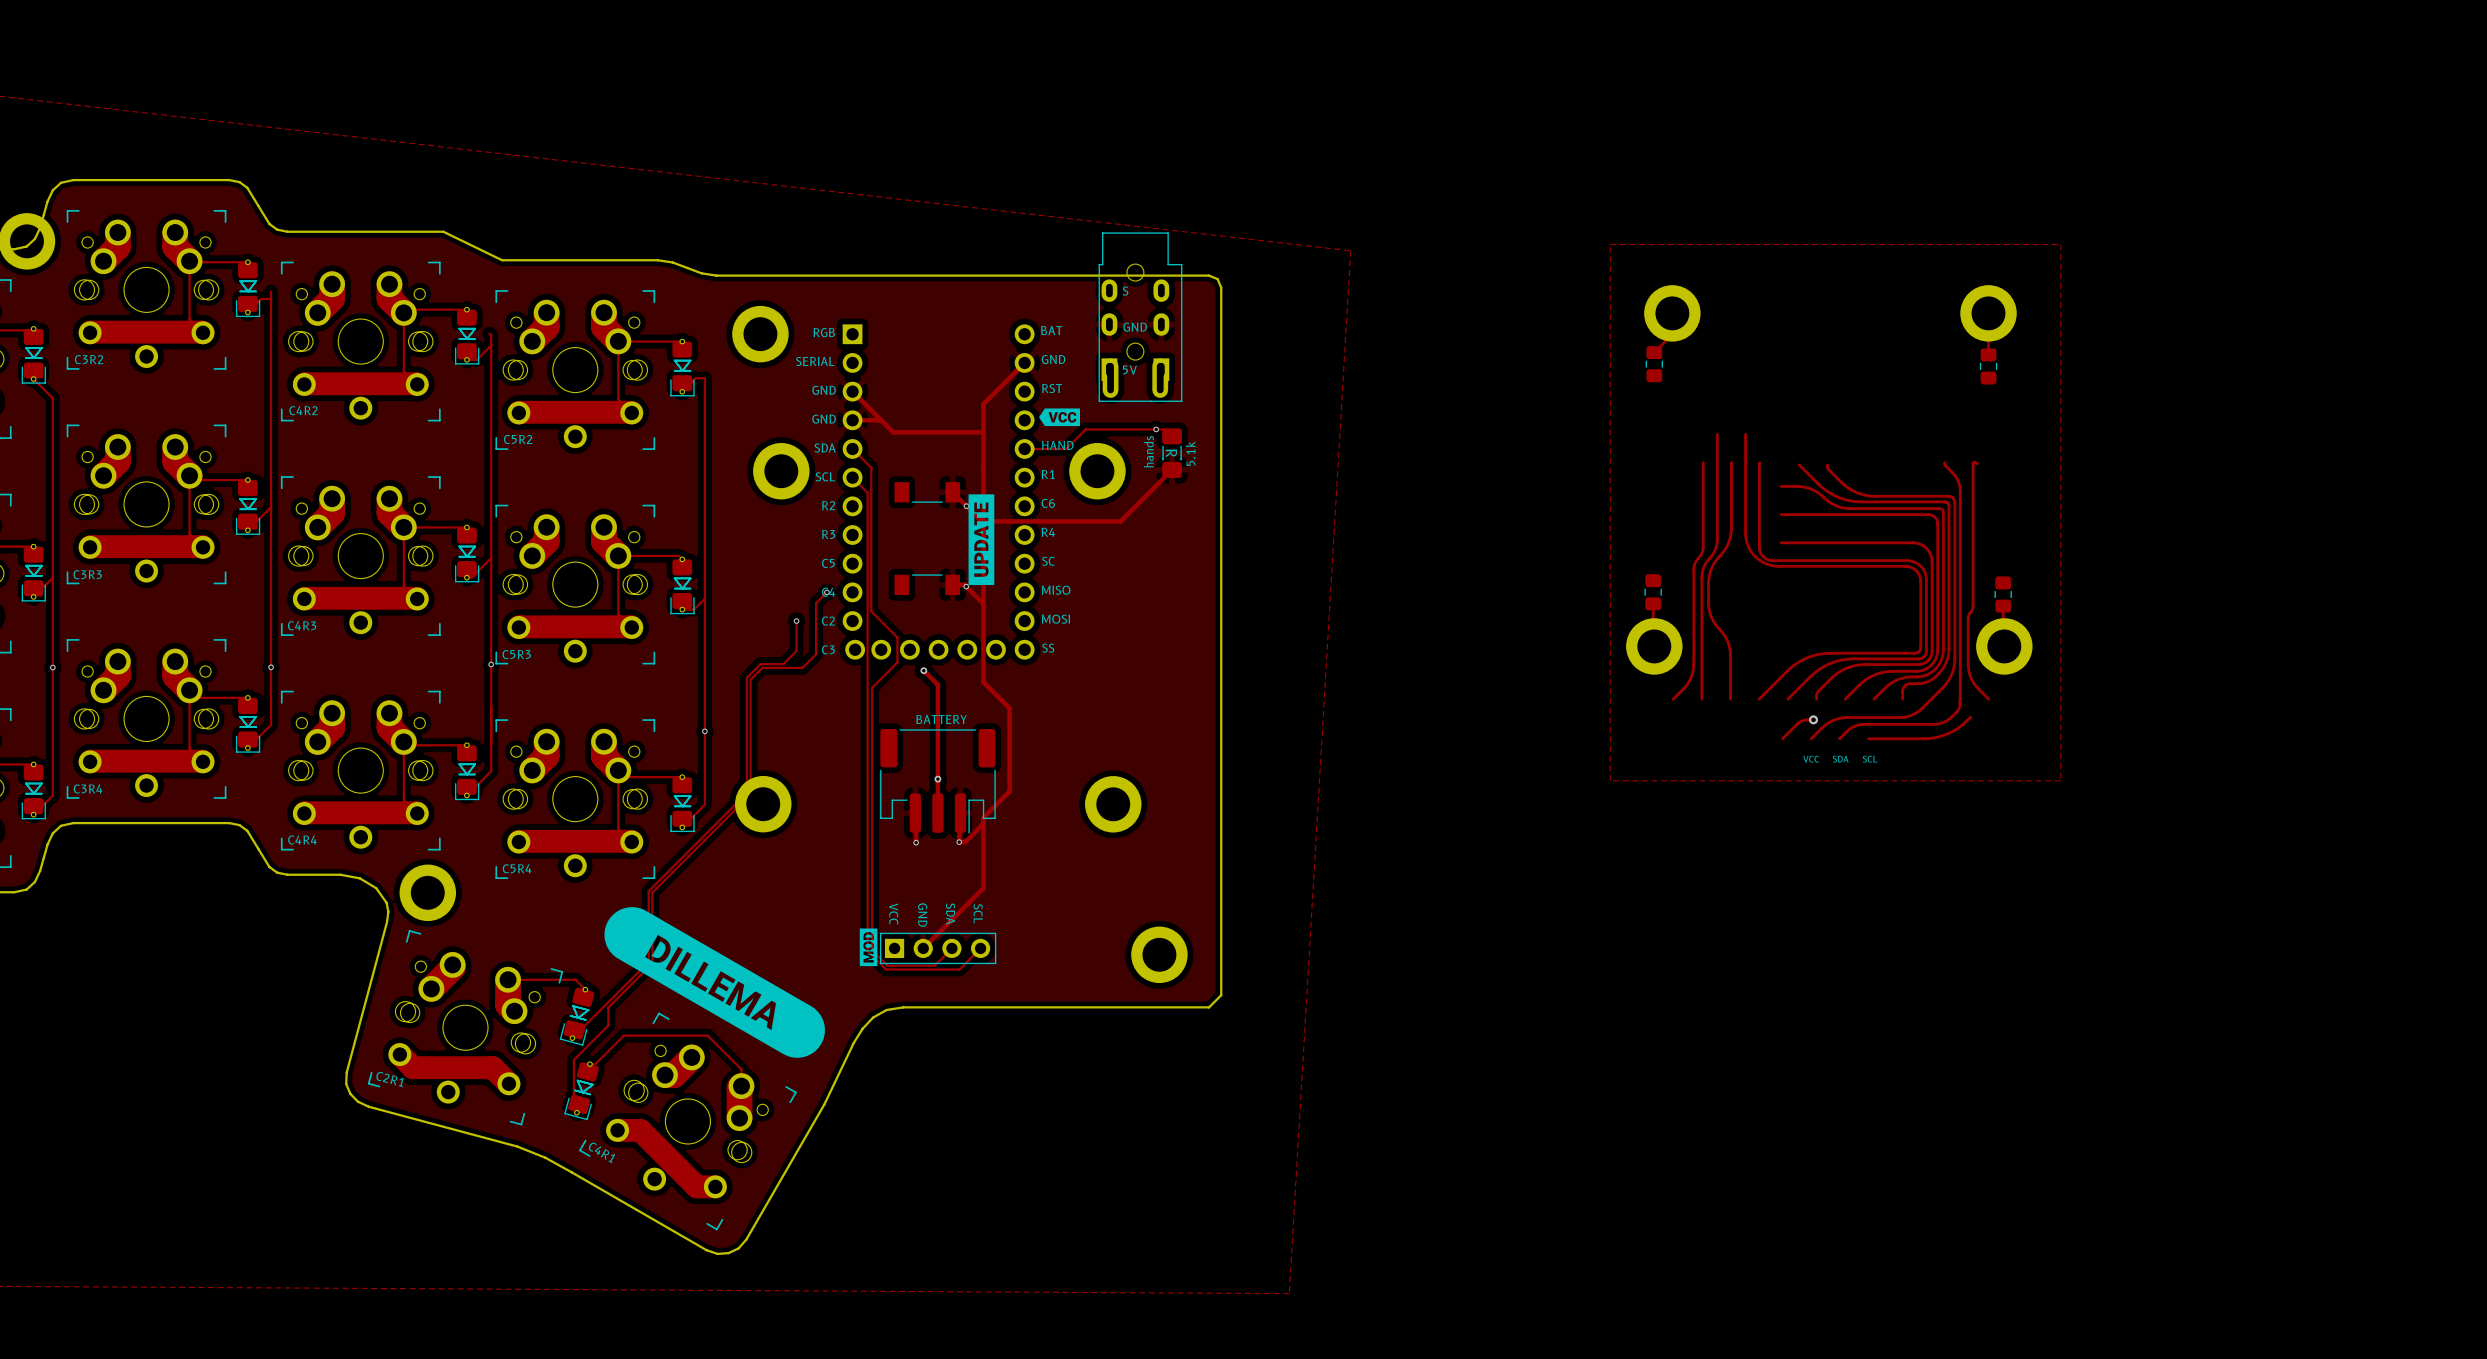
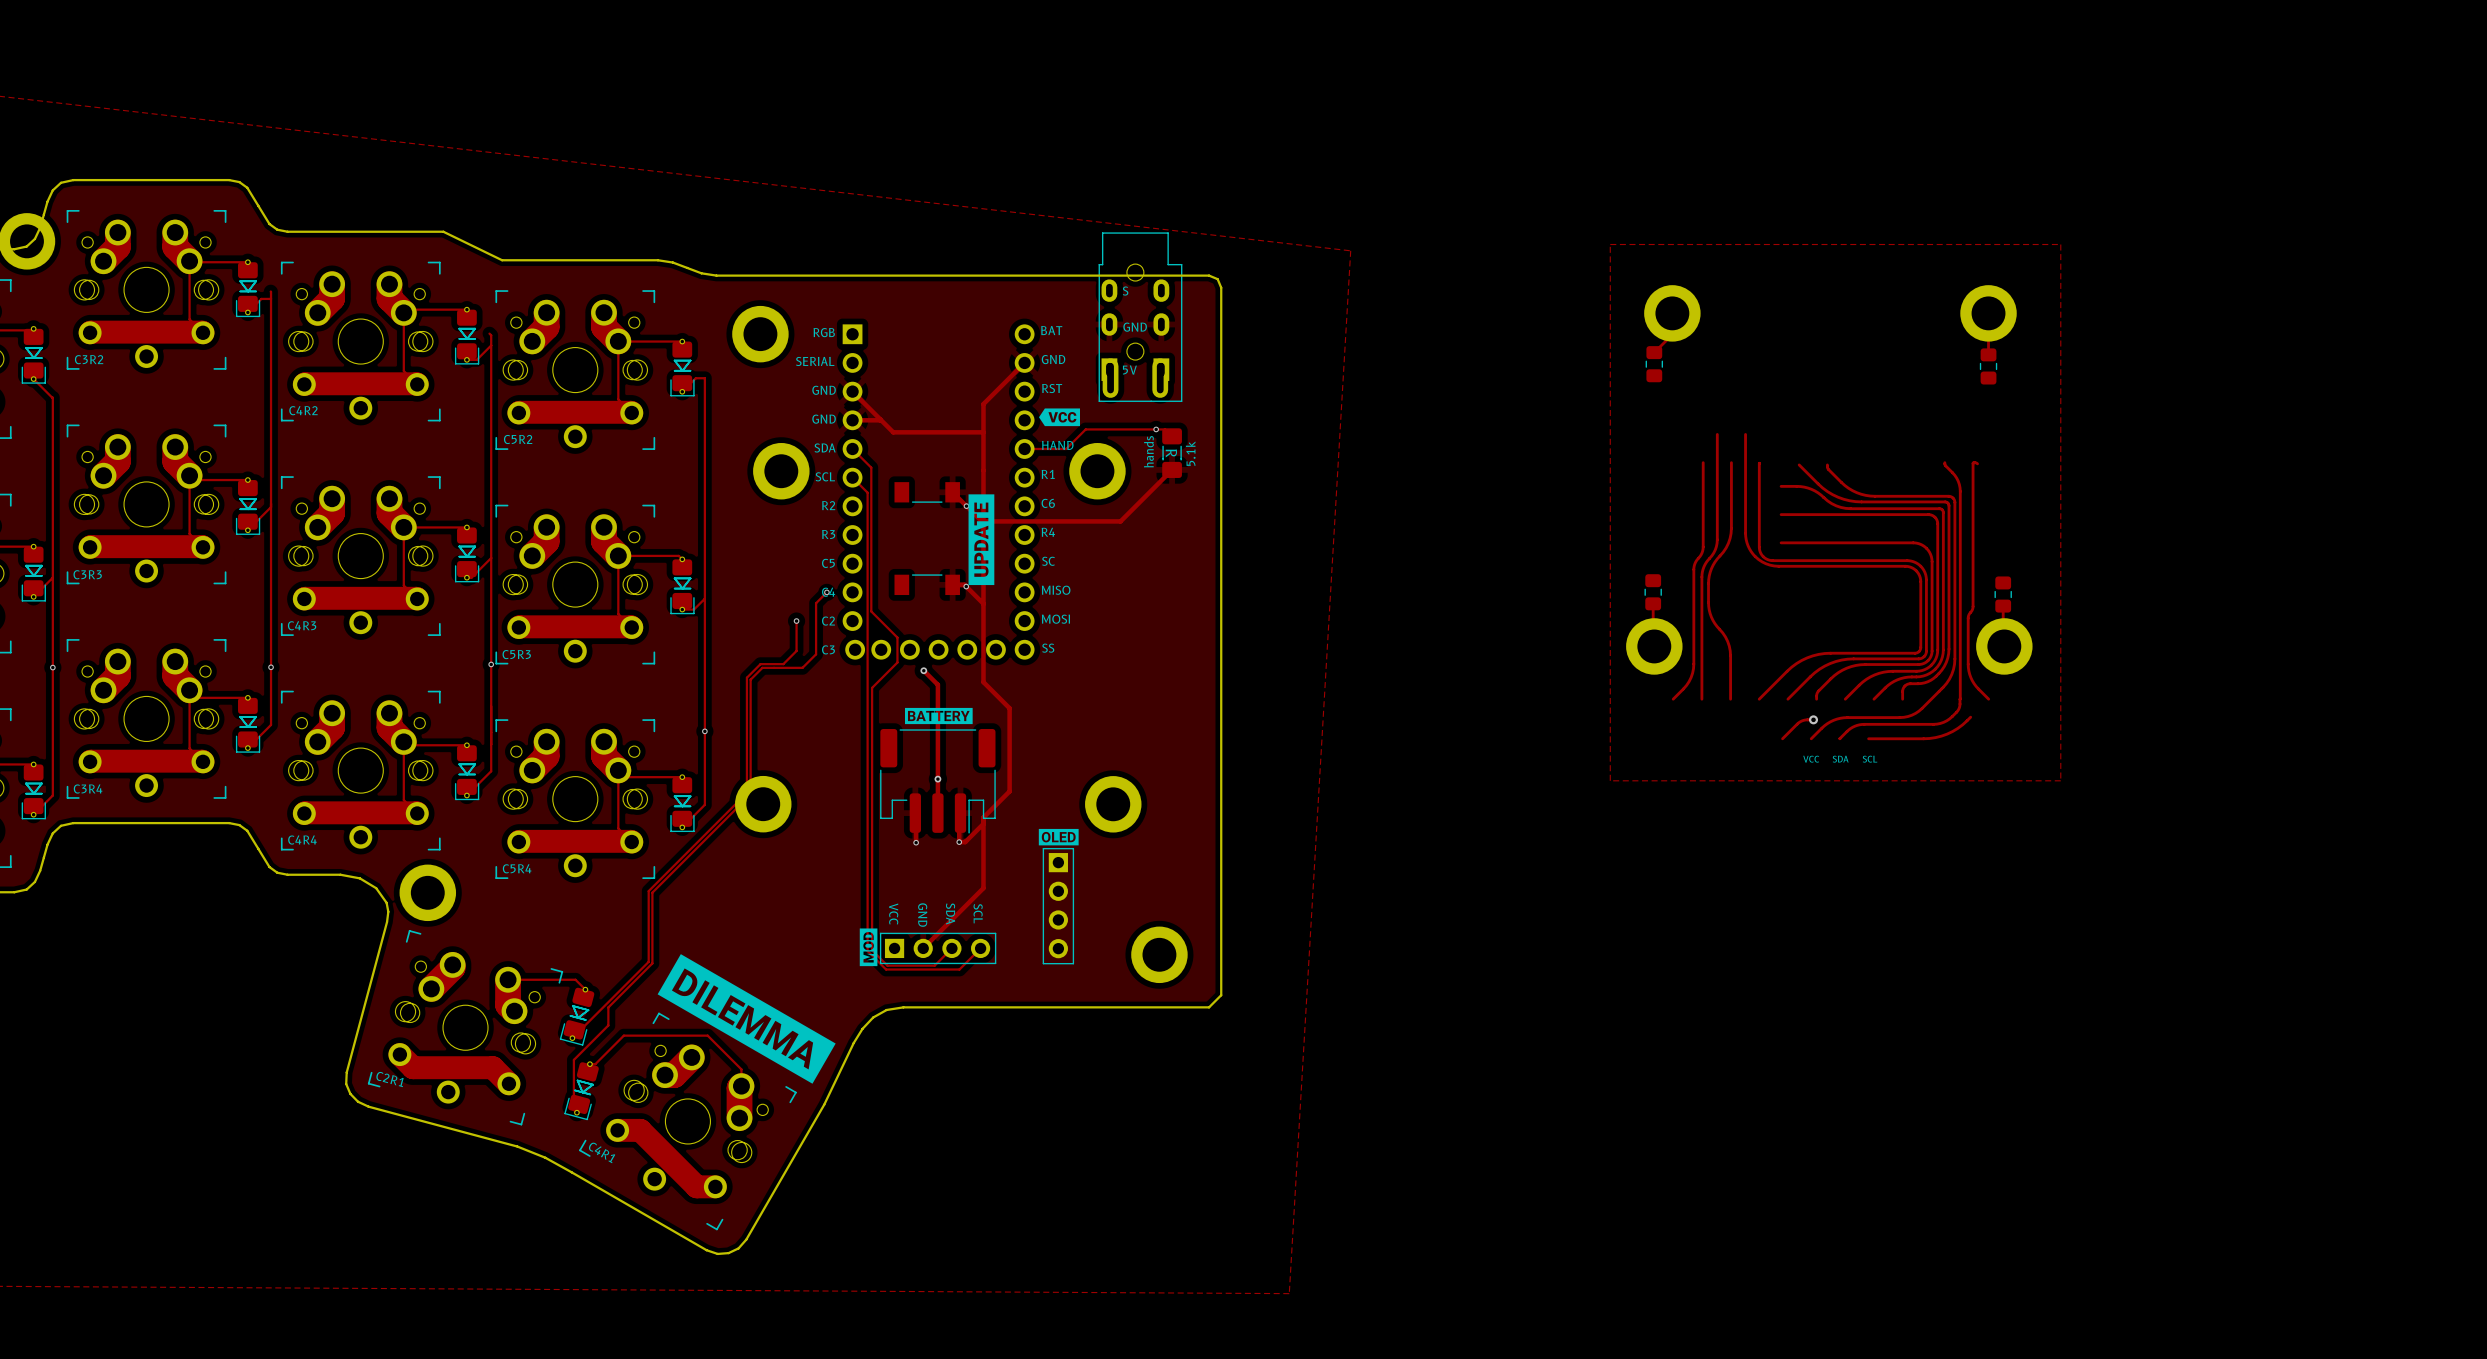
drawing: none -> [904, 707, 973, 725]
text: BATTERY (941, 719) -> none
drawing: none -> [1038, 828, 1079, 846]
part: none -> (1058, 906)
drawing: [604, 907, 825, 1058] -> none
drawing: none -> [657, 954, 836, 1084]

